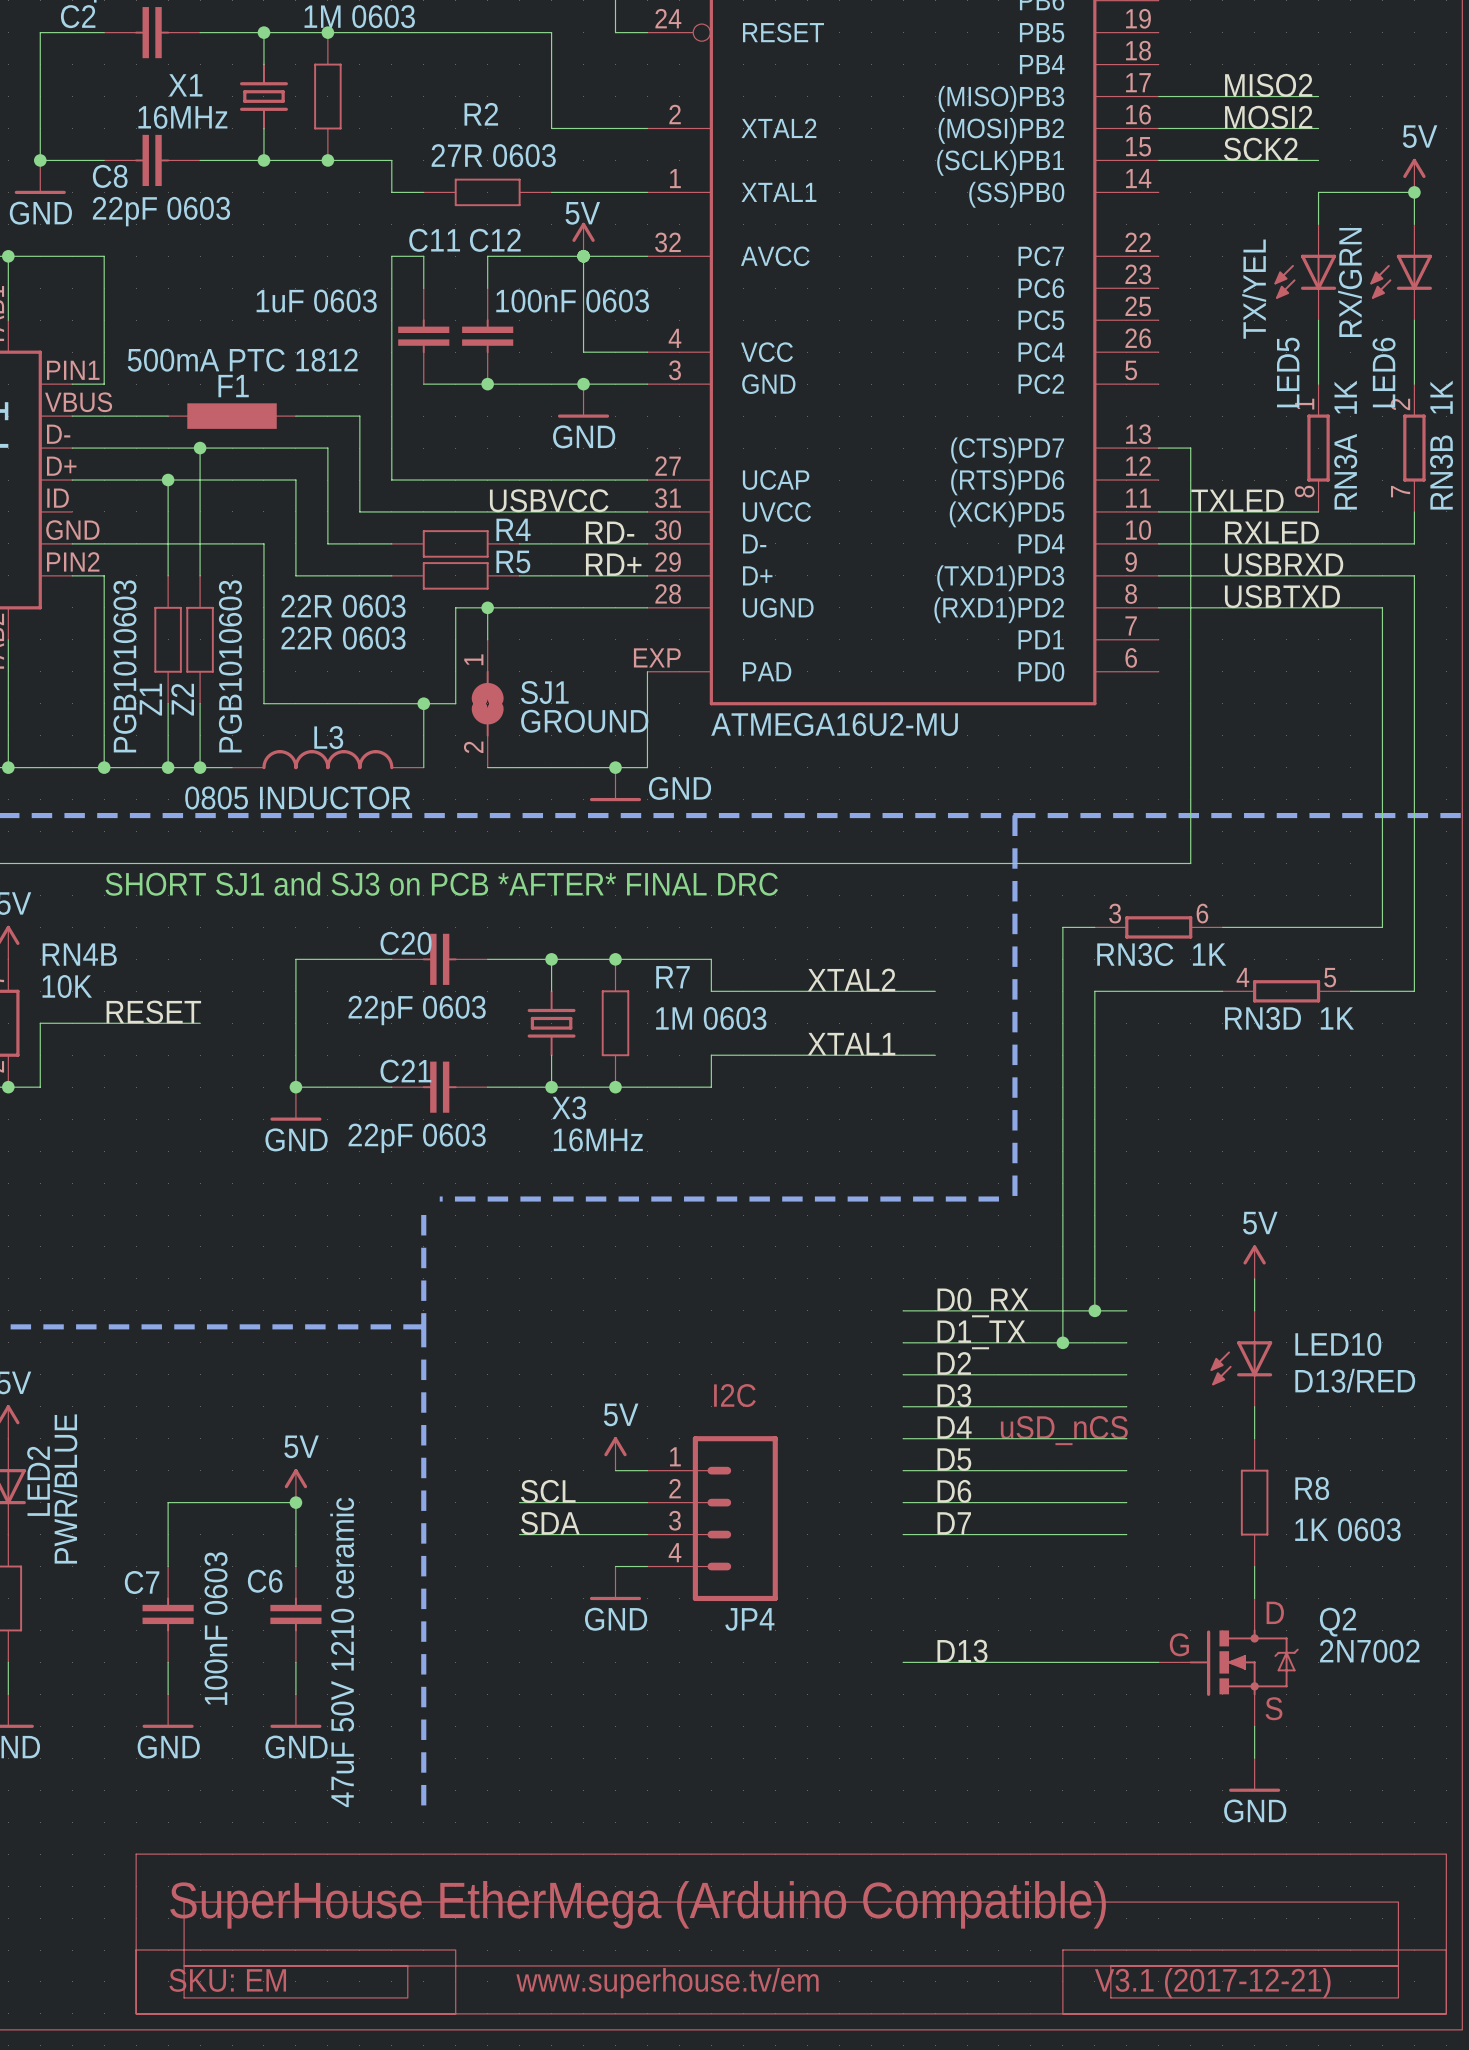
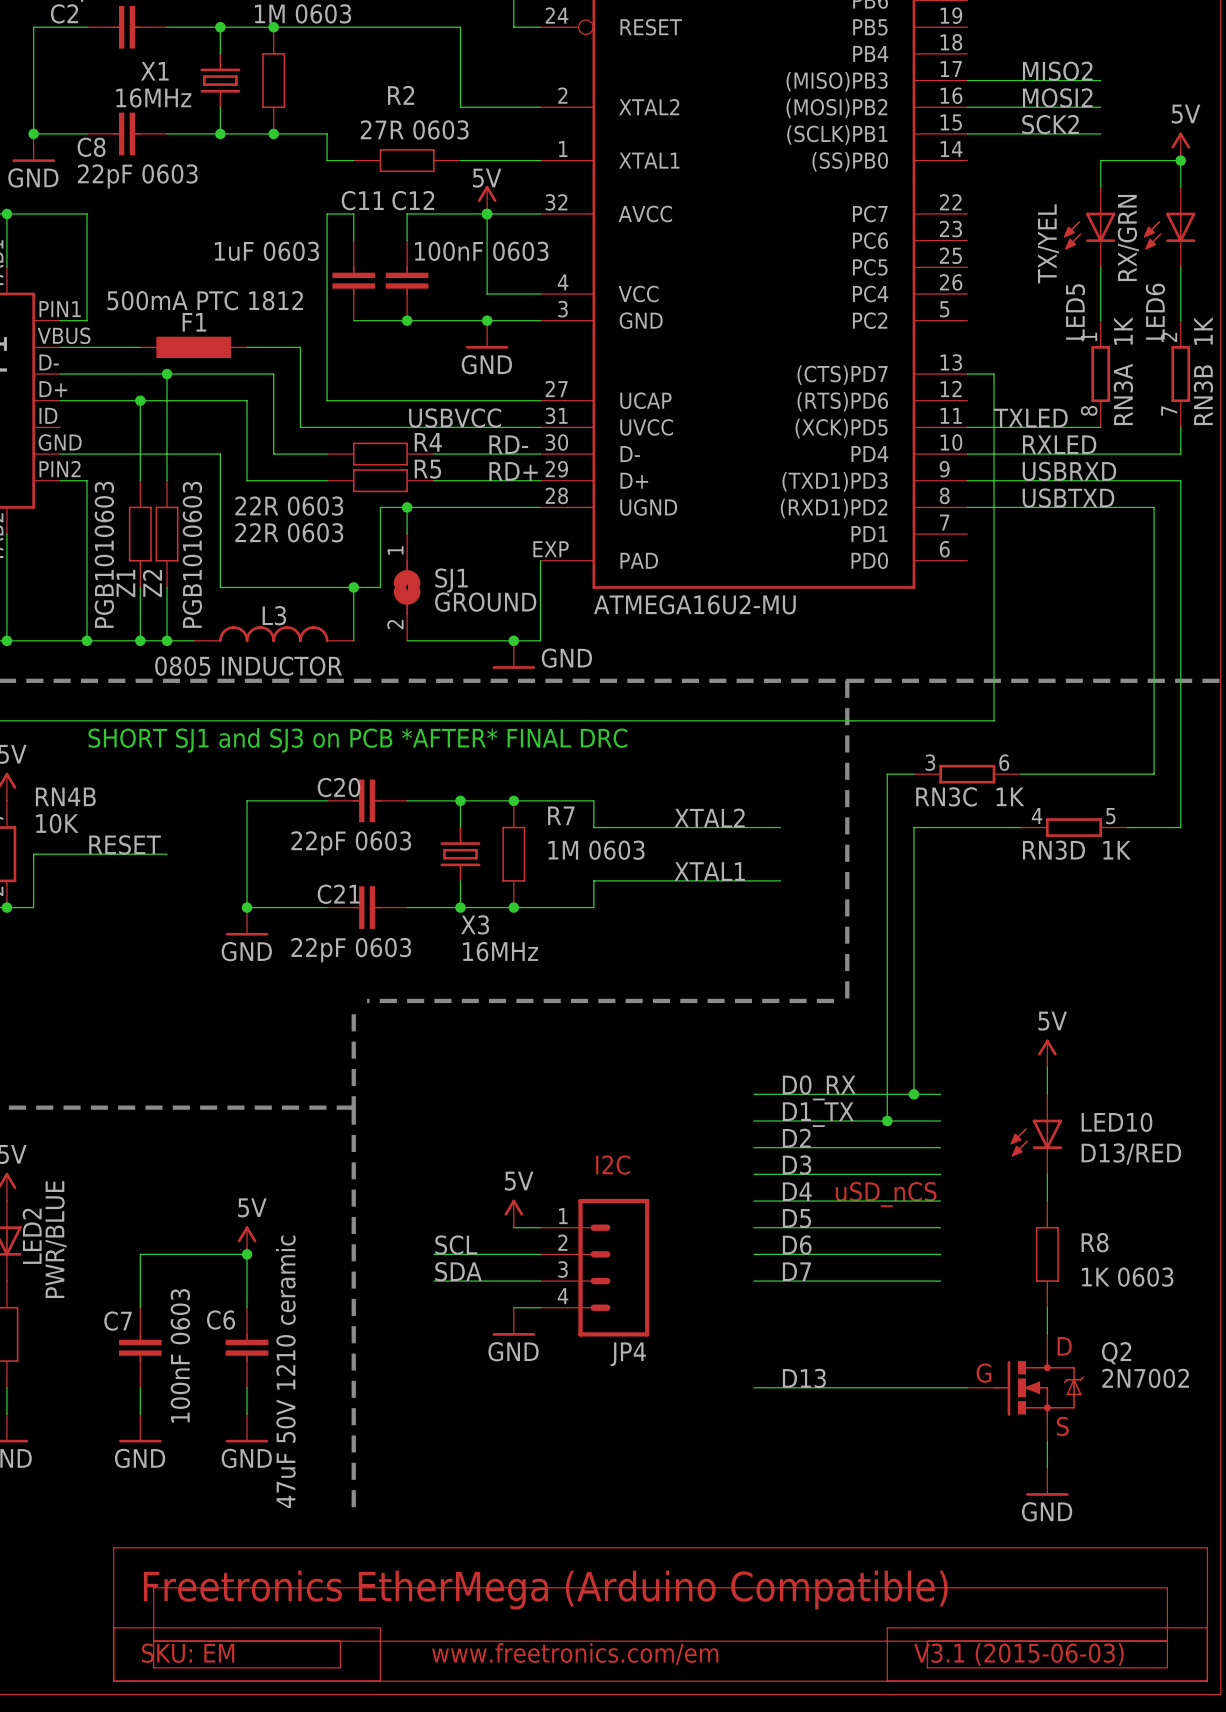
text: SuperHouse EtherMega (Arduino Compatible) (638, 1904) -> Freetronics EtherMega (Arduino Compatible) (545, 1590)
text: www.superhouse.tv/em (667, 1983) -> www.freetronics.com/em (575, 1653)
text: V3.1 (2017-12-21) (1212, 1983) -> V3.1 (2015-06-03) (1018, 1654)

